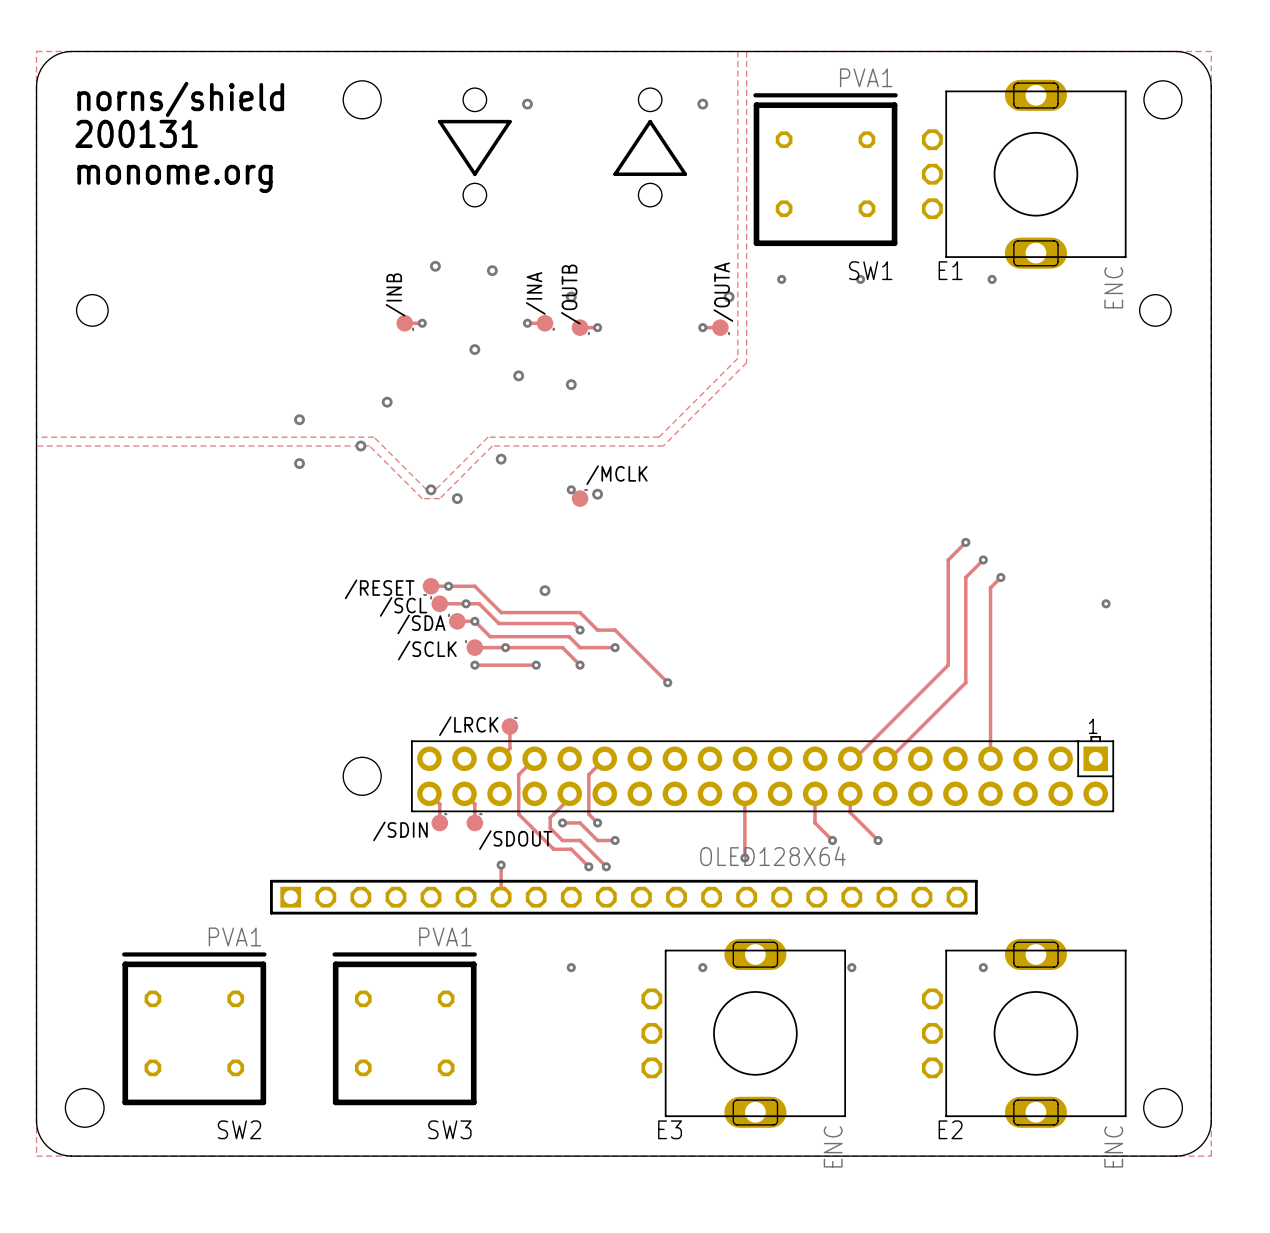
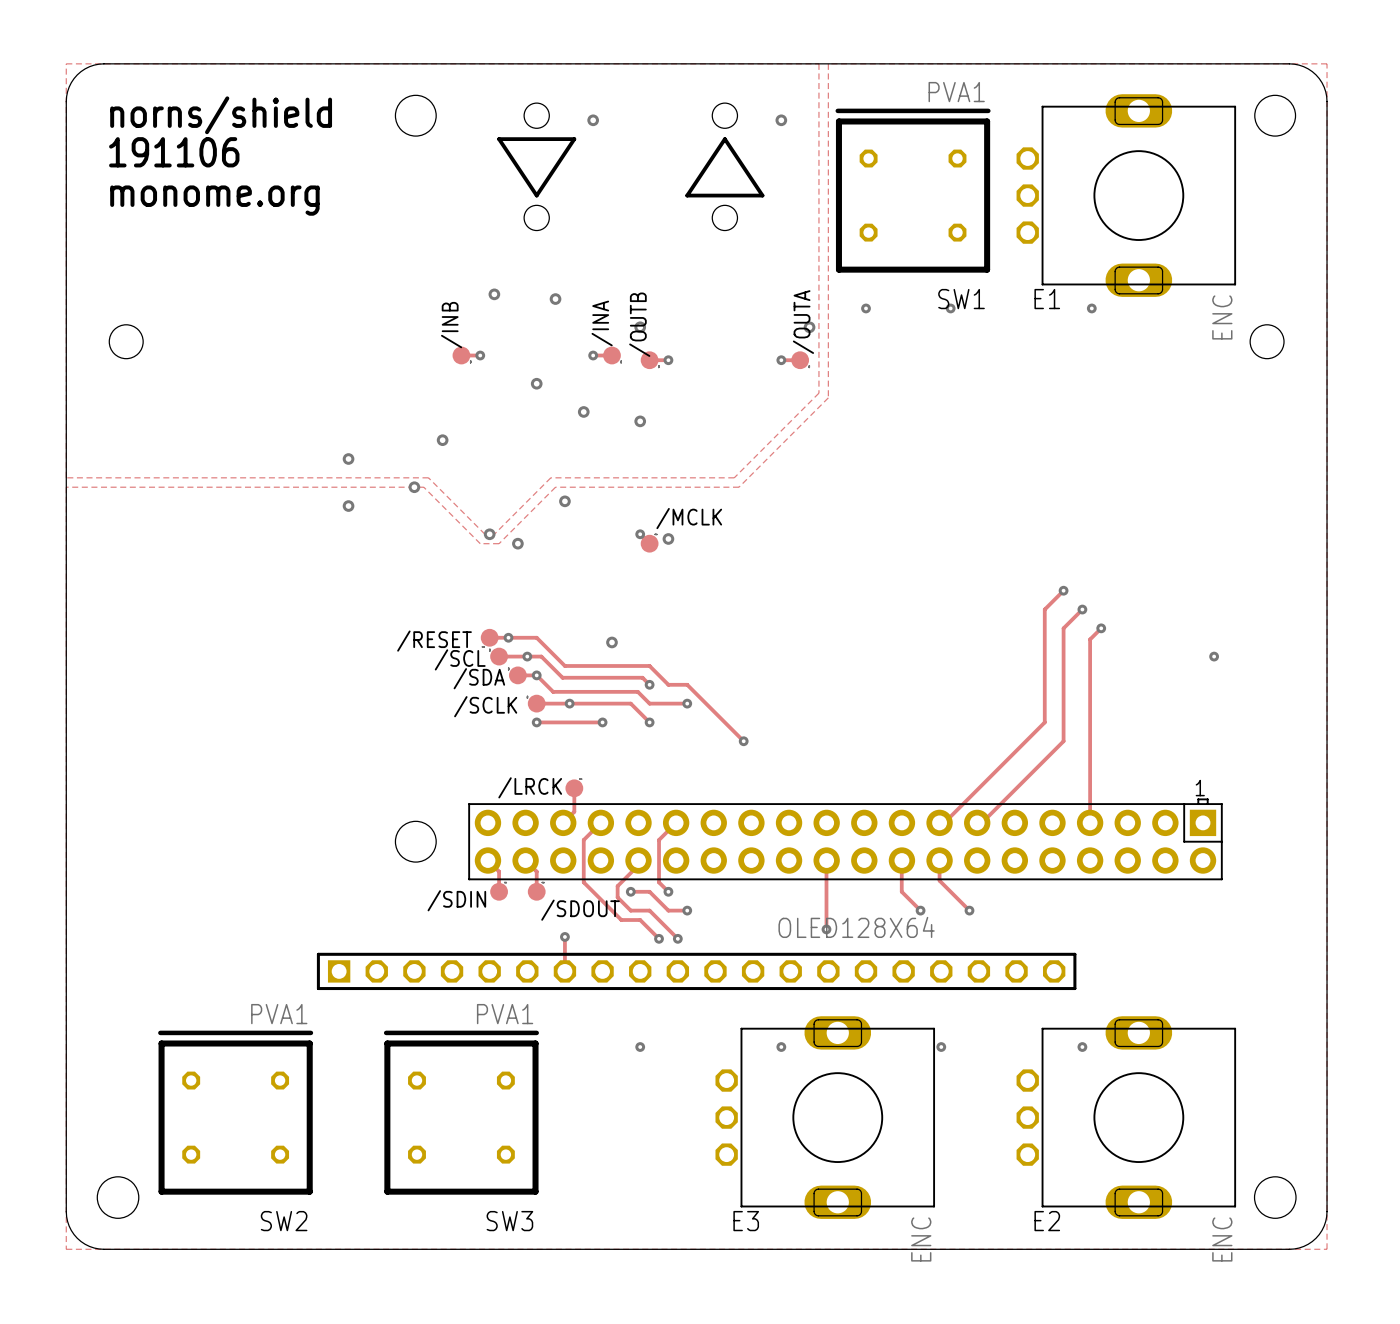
text: 200131 (136, 133) -> 191106 (174, 152)

